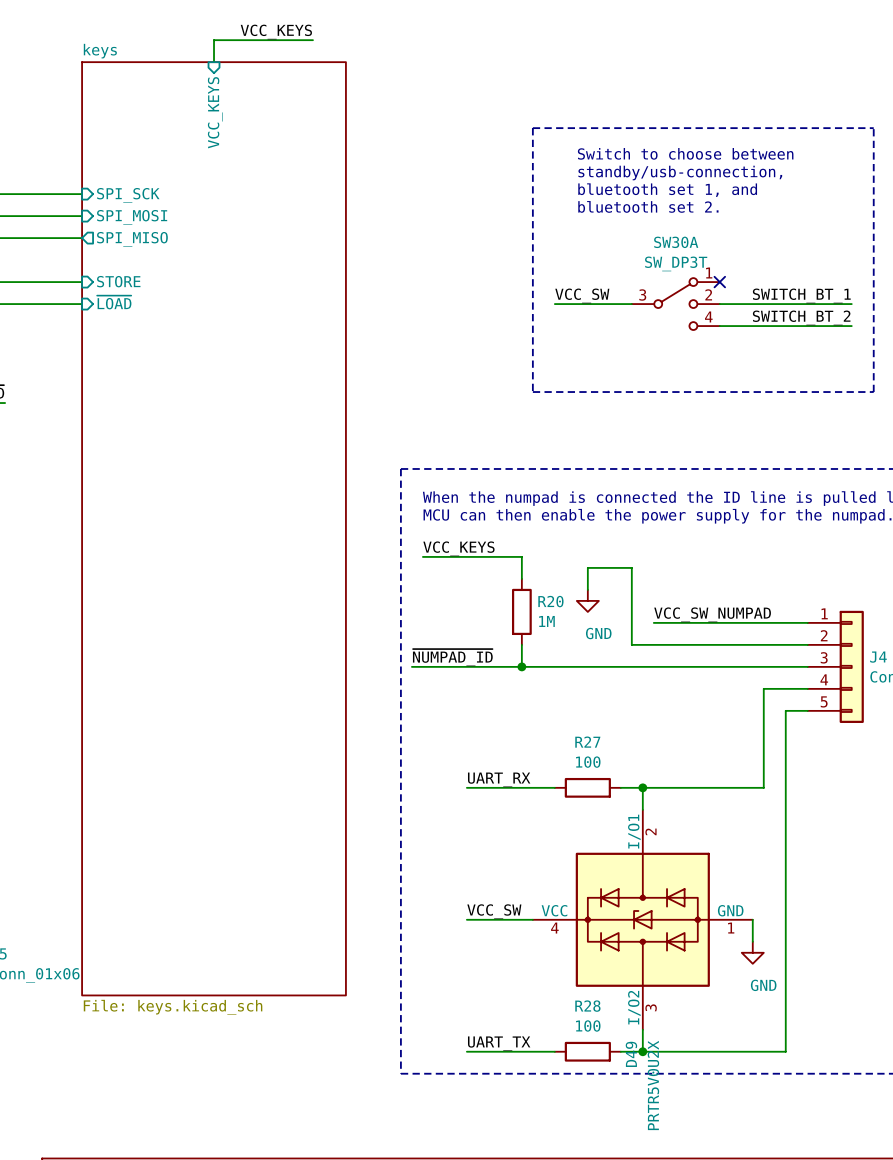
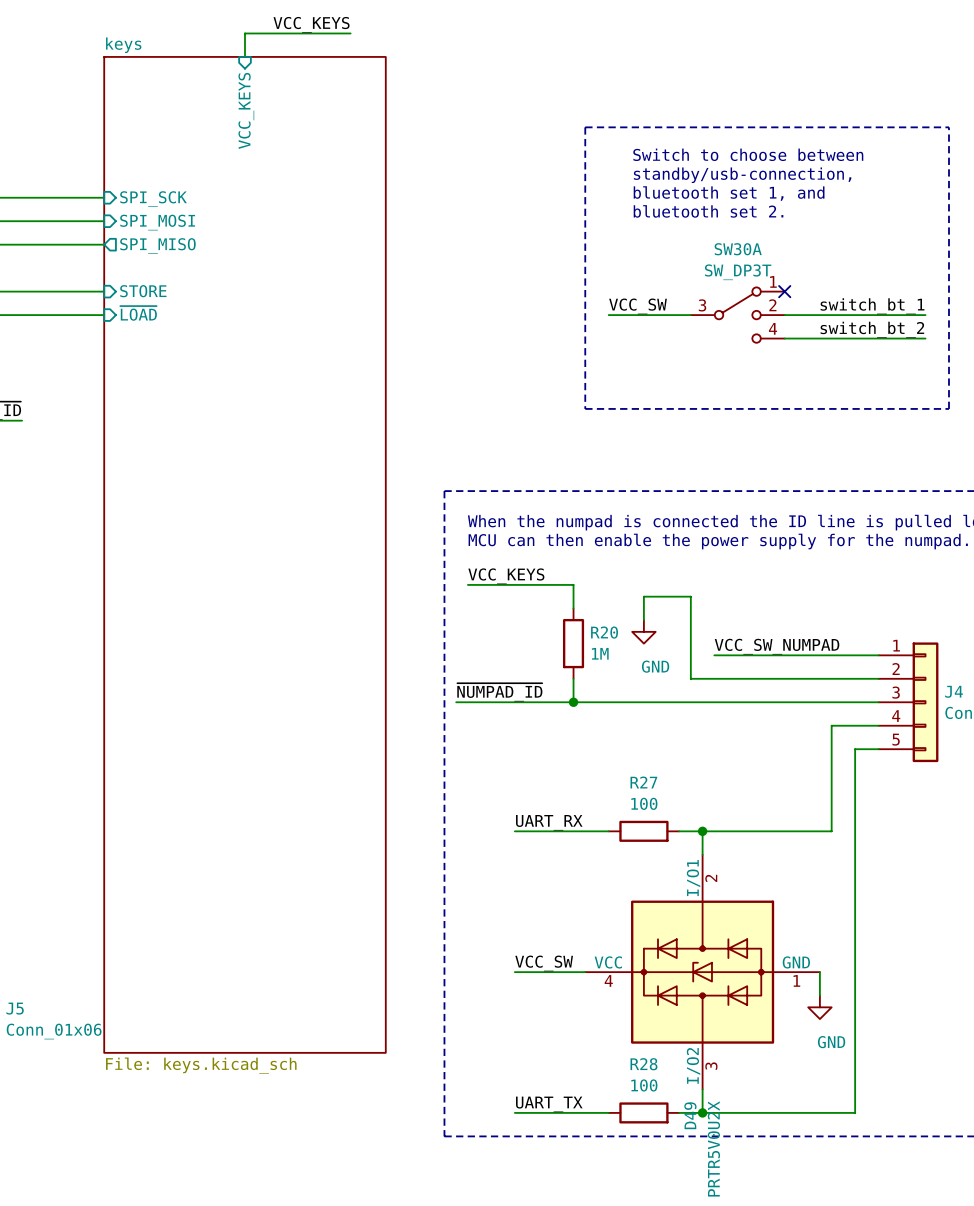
label: SWITCH_BT_1 (801, 295) -> switch_bt_1 (872, 306)
label: SWITCH_BT_2 (801, 317) -> switch_bt_2 (872, 329)

